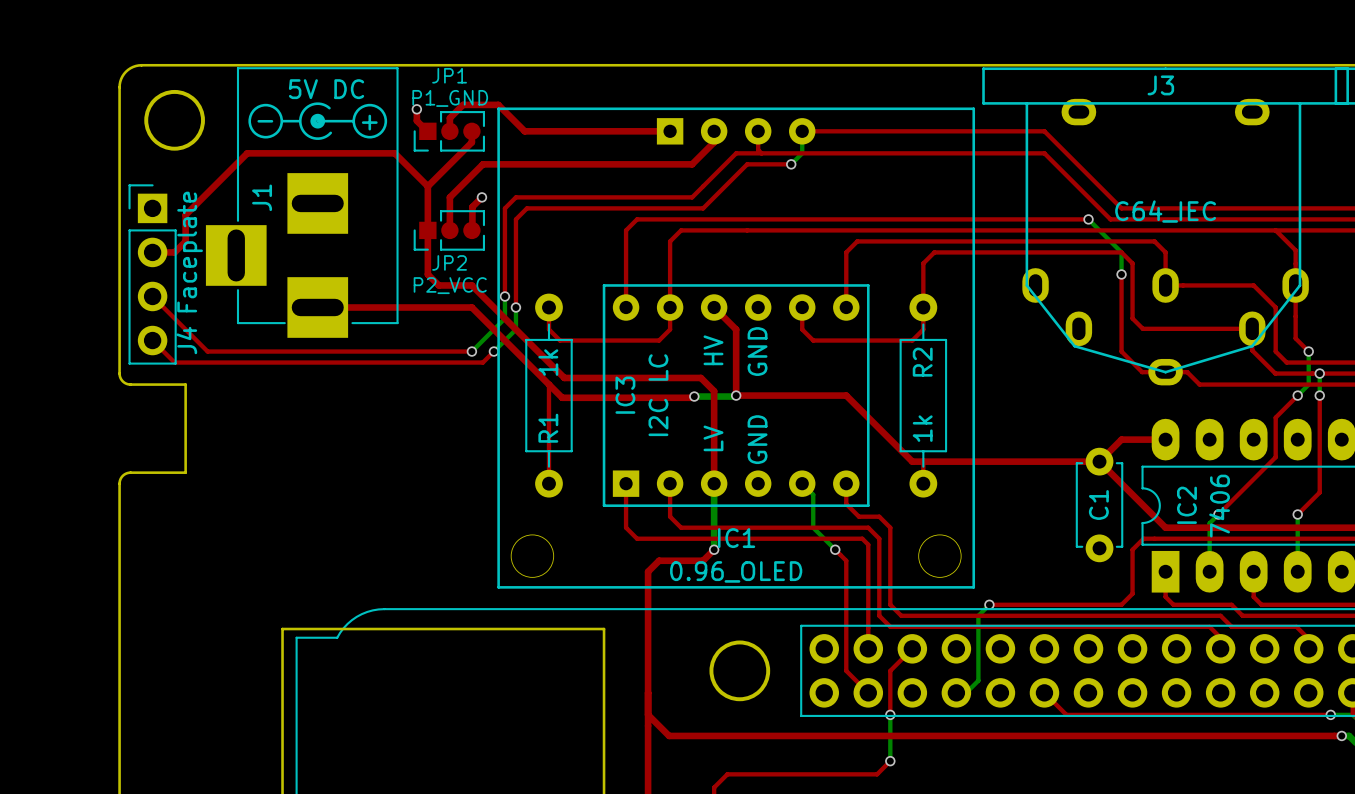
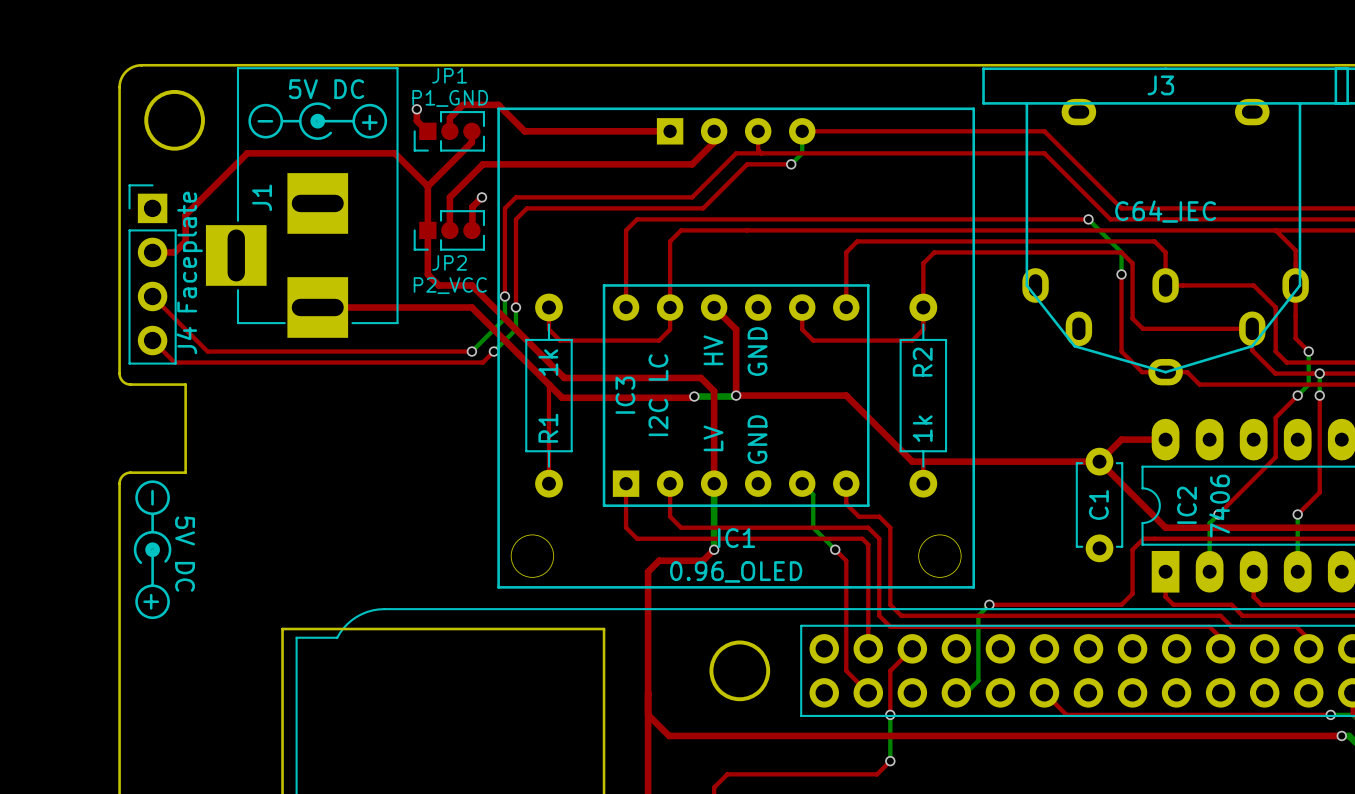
drawing: none -> [133, 480, 172, 620]
text: none -> - (152, 497)
text: none -> 5V DC (185, 554)
text: none -> + (151, 601)

